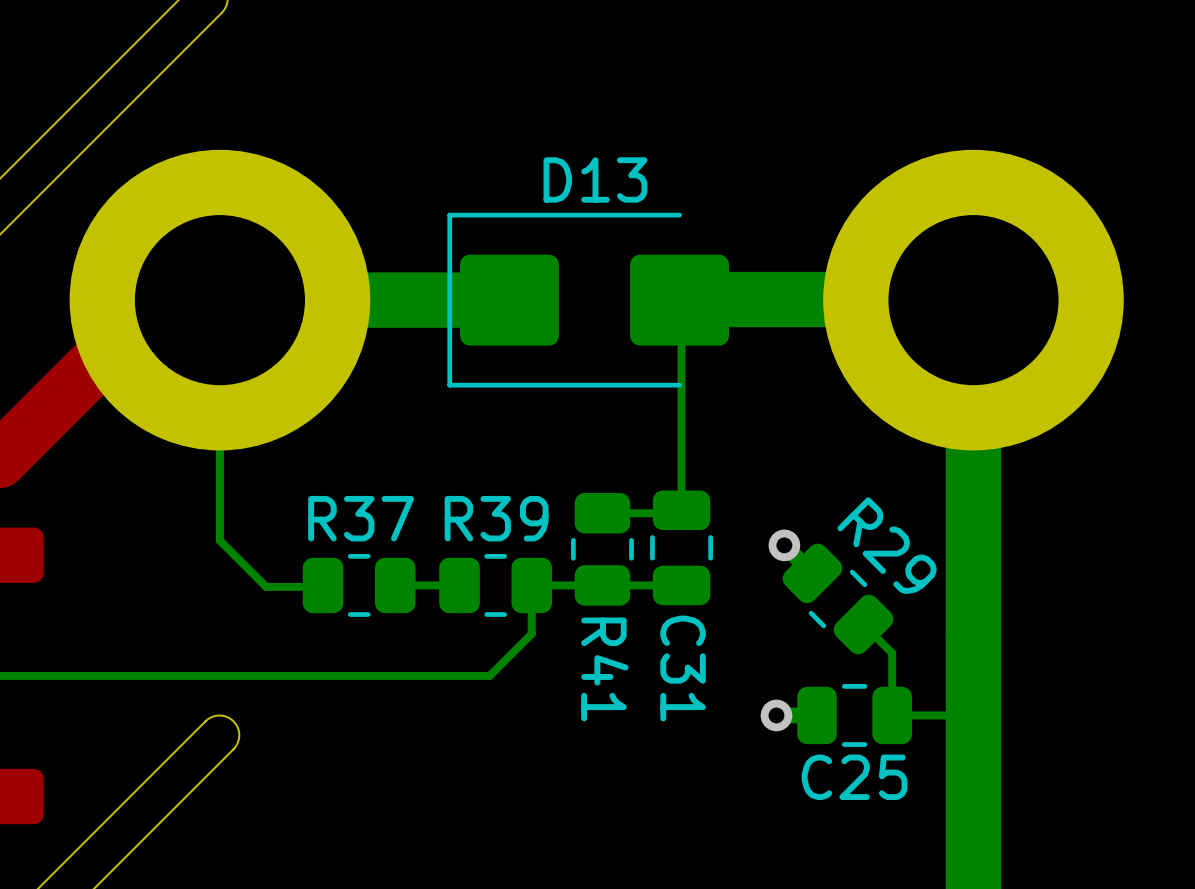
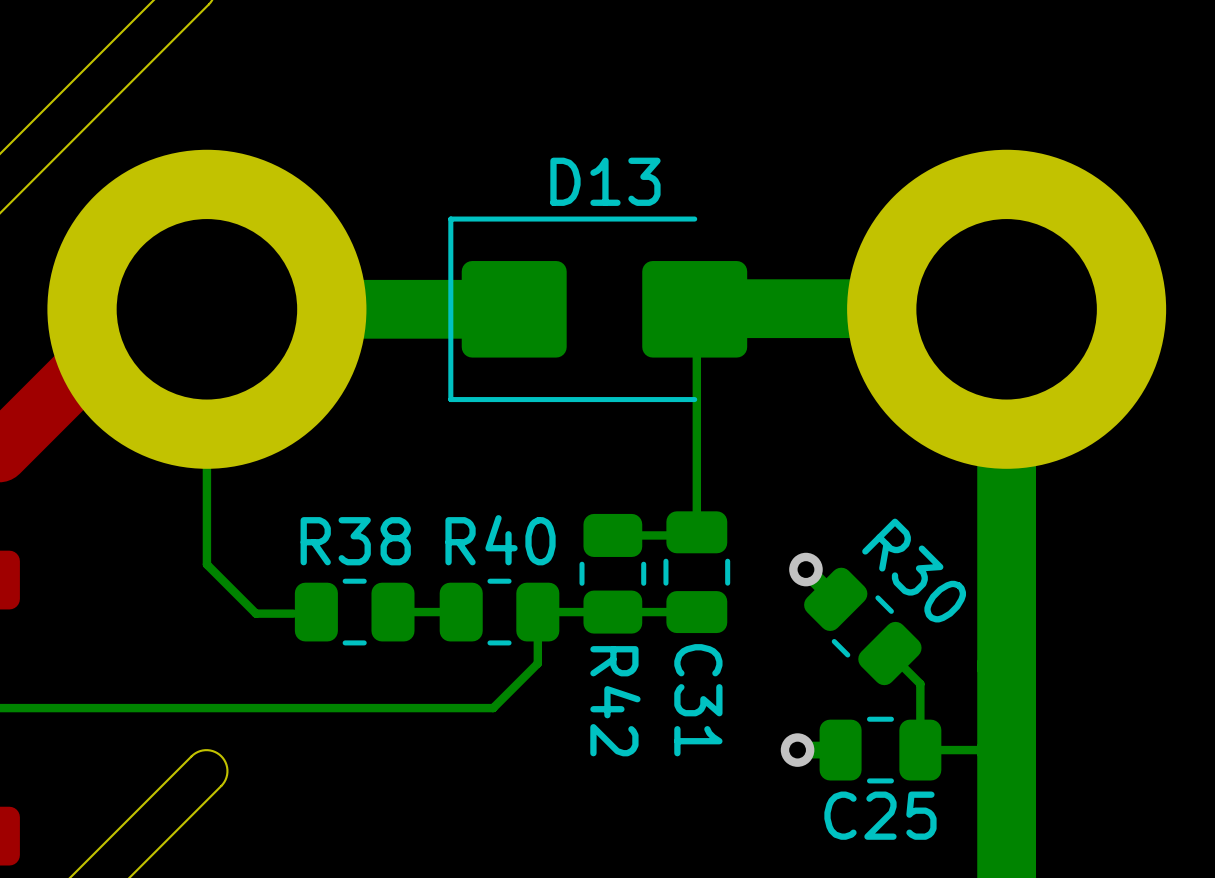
R37 name: R37 (361, 518) -> R38 (355, 541)
R39 name: R39 (496, 518) -> R40 (500, 540)
R29 name: R29 (886, 545) -> R30 (914, 570)
R41 name: R41 (604, 669) -> R42 (615, 701)

